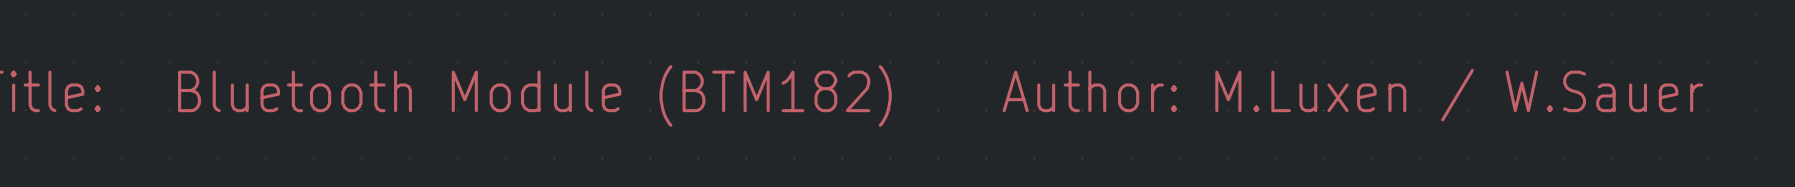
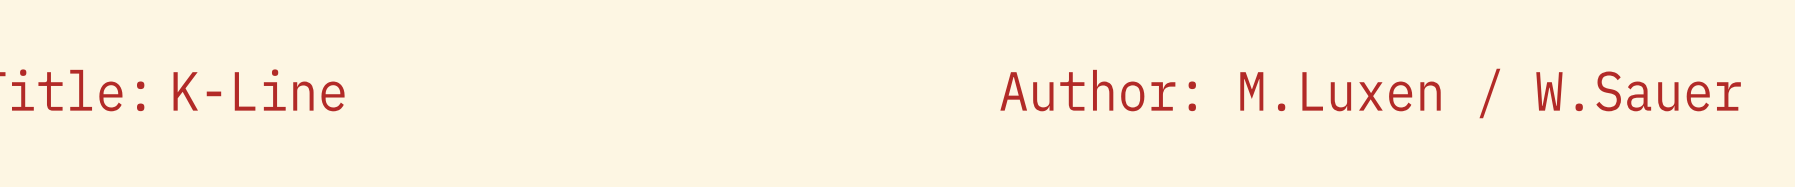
text: Bluetooth Module (BTM182) (534, 95) -> K-Line (259, 90)

